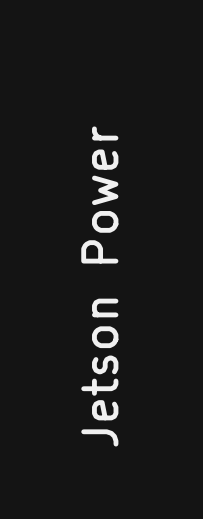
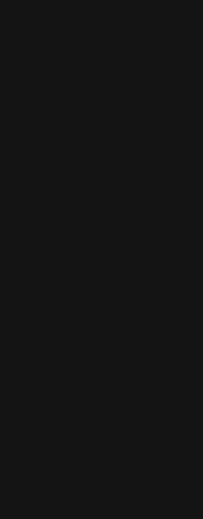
text: Jetson Power (99, 286) -> none

